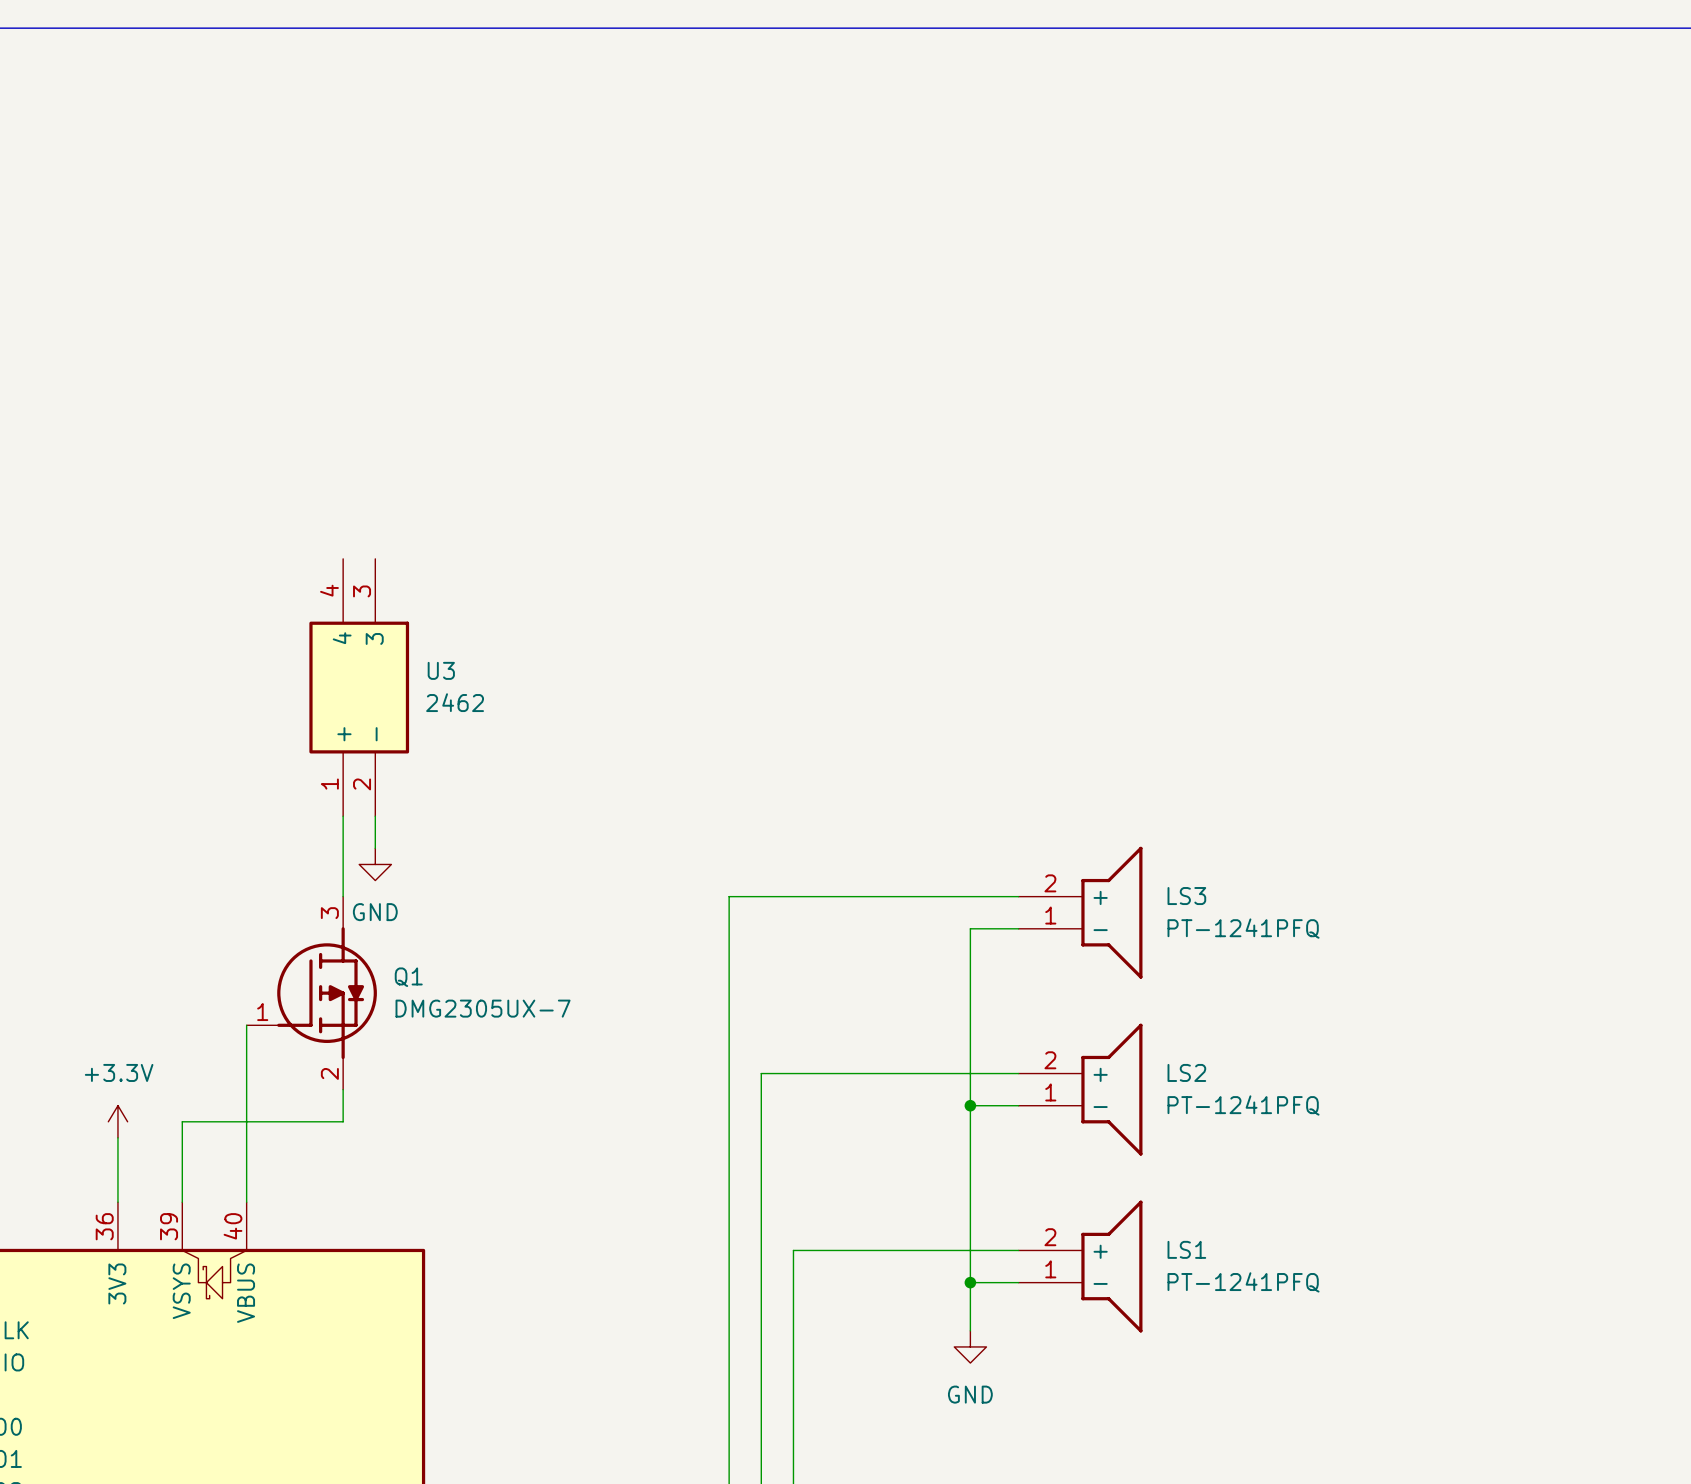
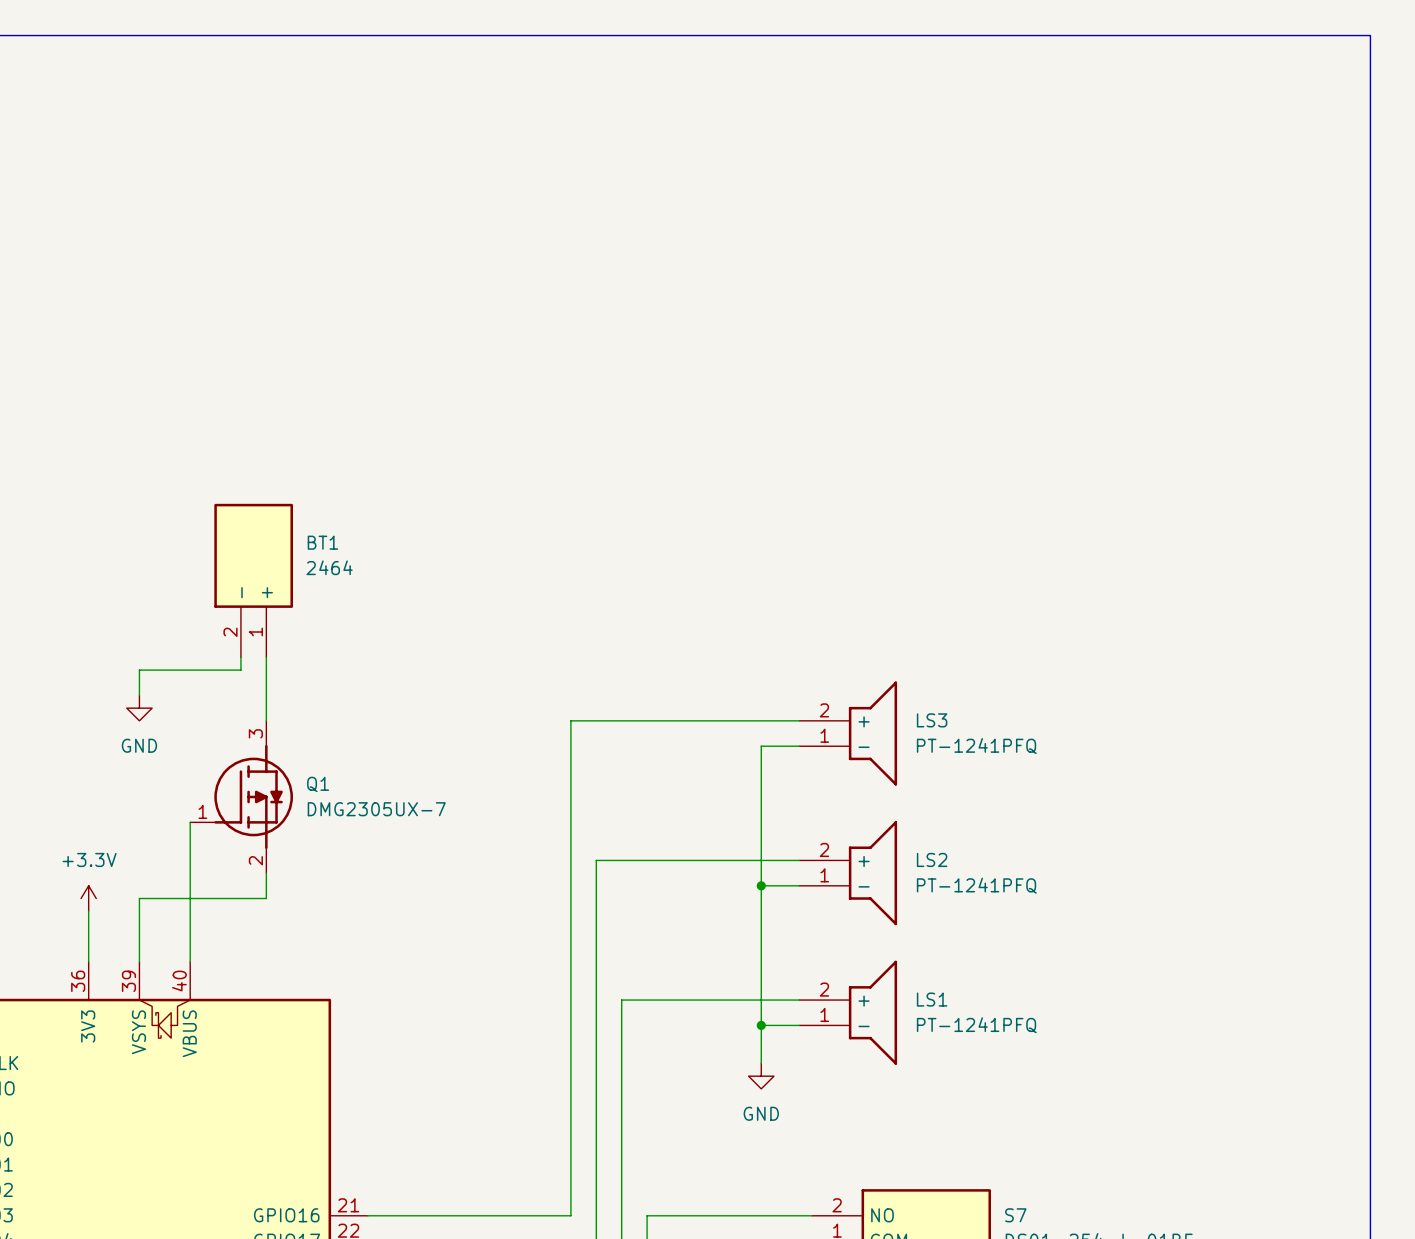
U3: 2462 (359, 687) -> none
BT1: none -> 2464 (253, 580)
wire: none -> (240, 657) (240, 670) (139, 670) (139, 695)
wire: (375, 816) (375, 848) -> none
power symbol position: GND (375, 864) -> GND (139, 708)

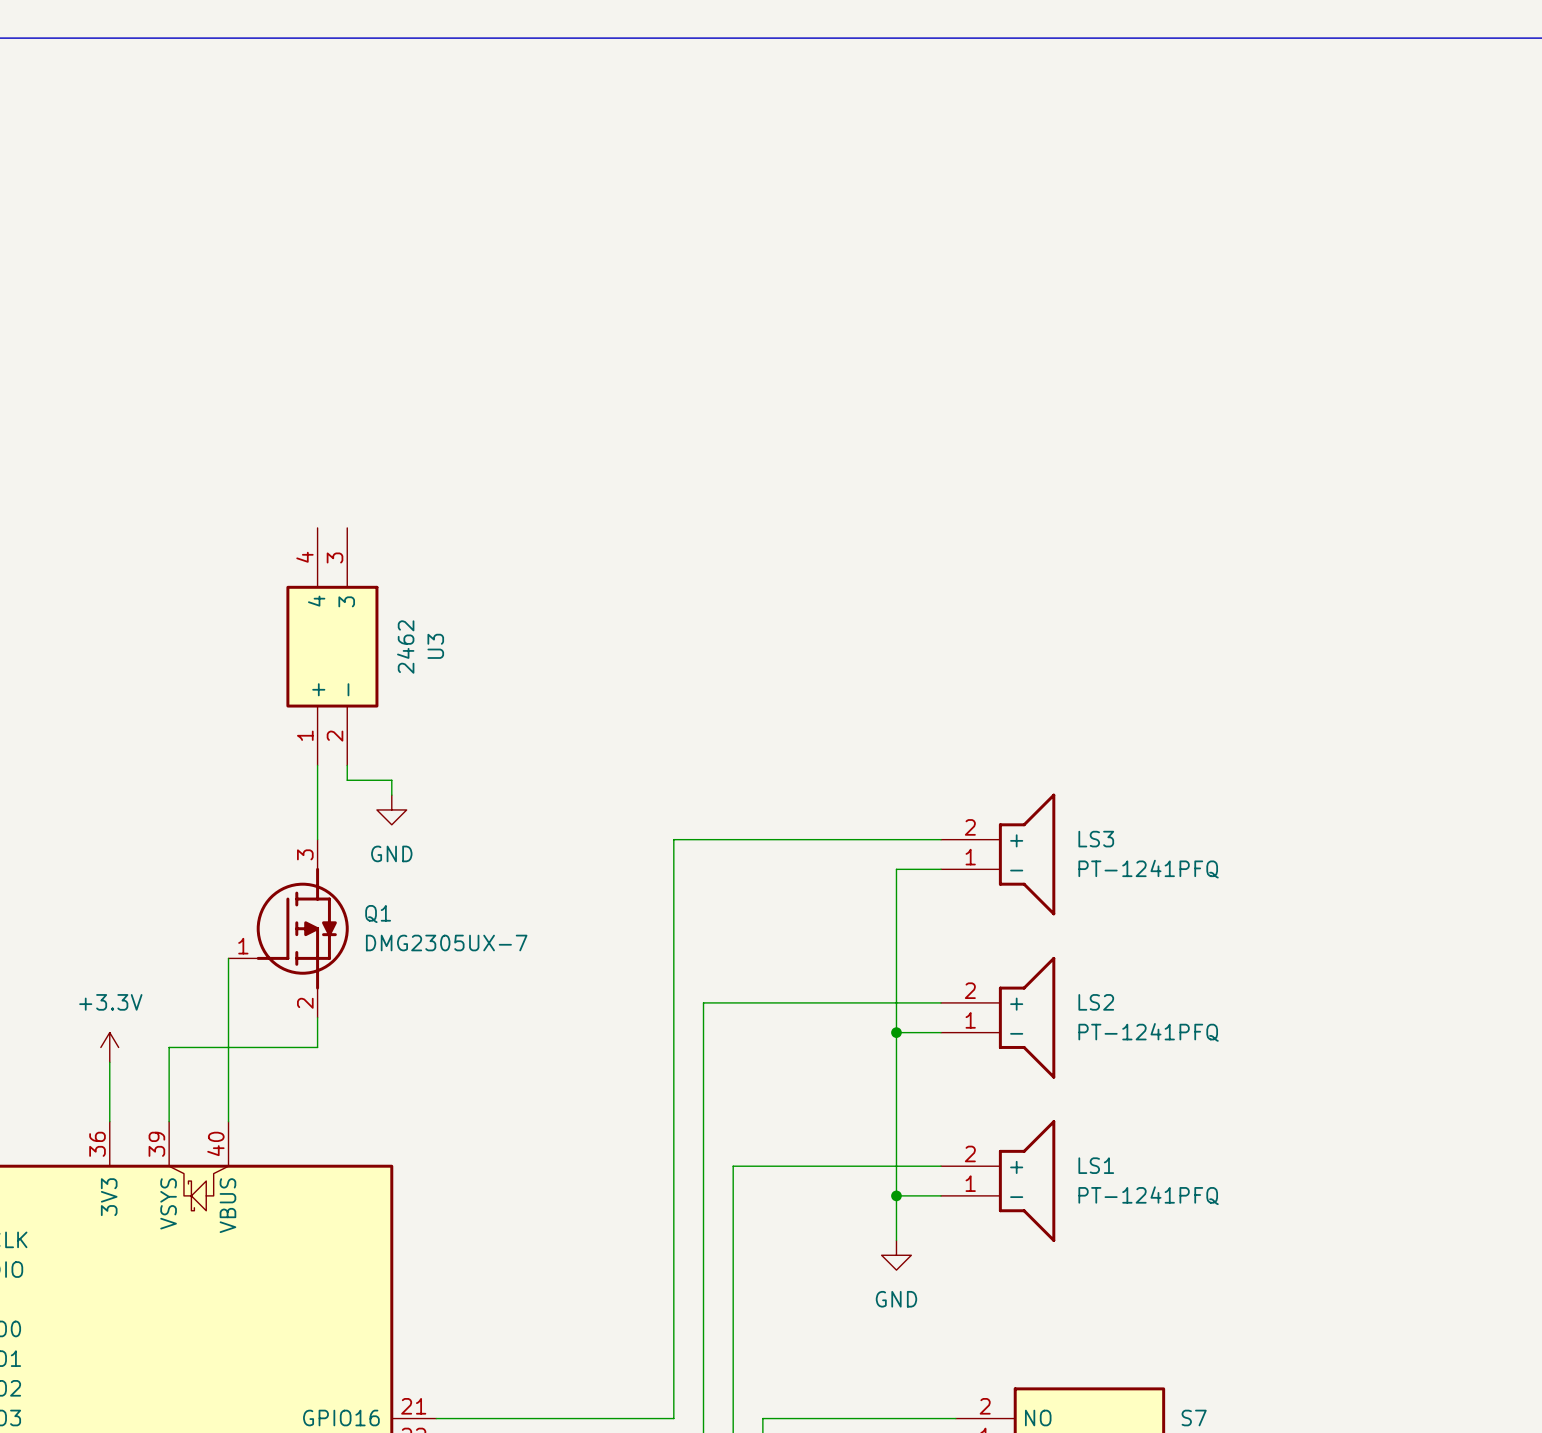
U3: none -> 2462 (332, 646)
BT1: 2464 (253, 580) -> none
wire: (240, 657) (240, 670) (139, 670) (139, 695) -> none
wire: none -> (347, 765) (347, 780) (391, 780) (391, 795)
power symbol position: GND (139, 708) -> GND (391, 809)

